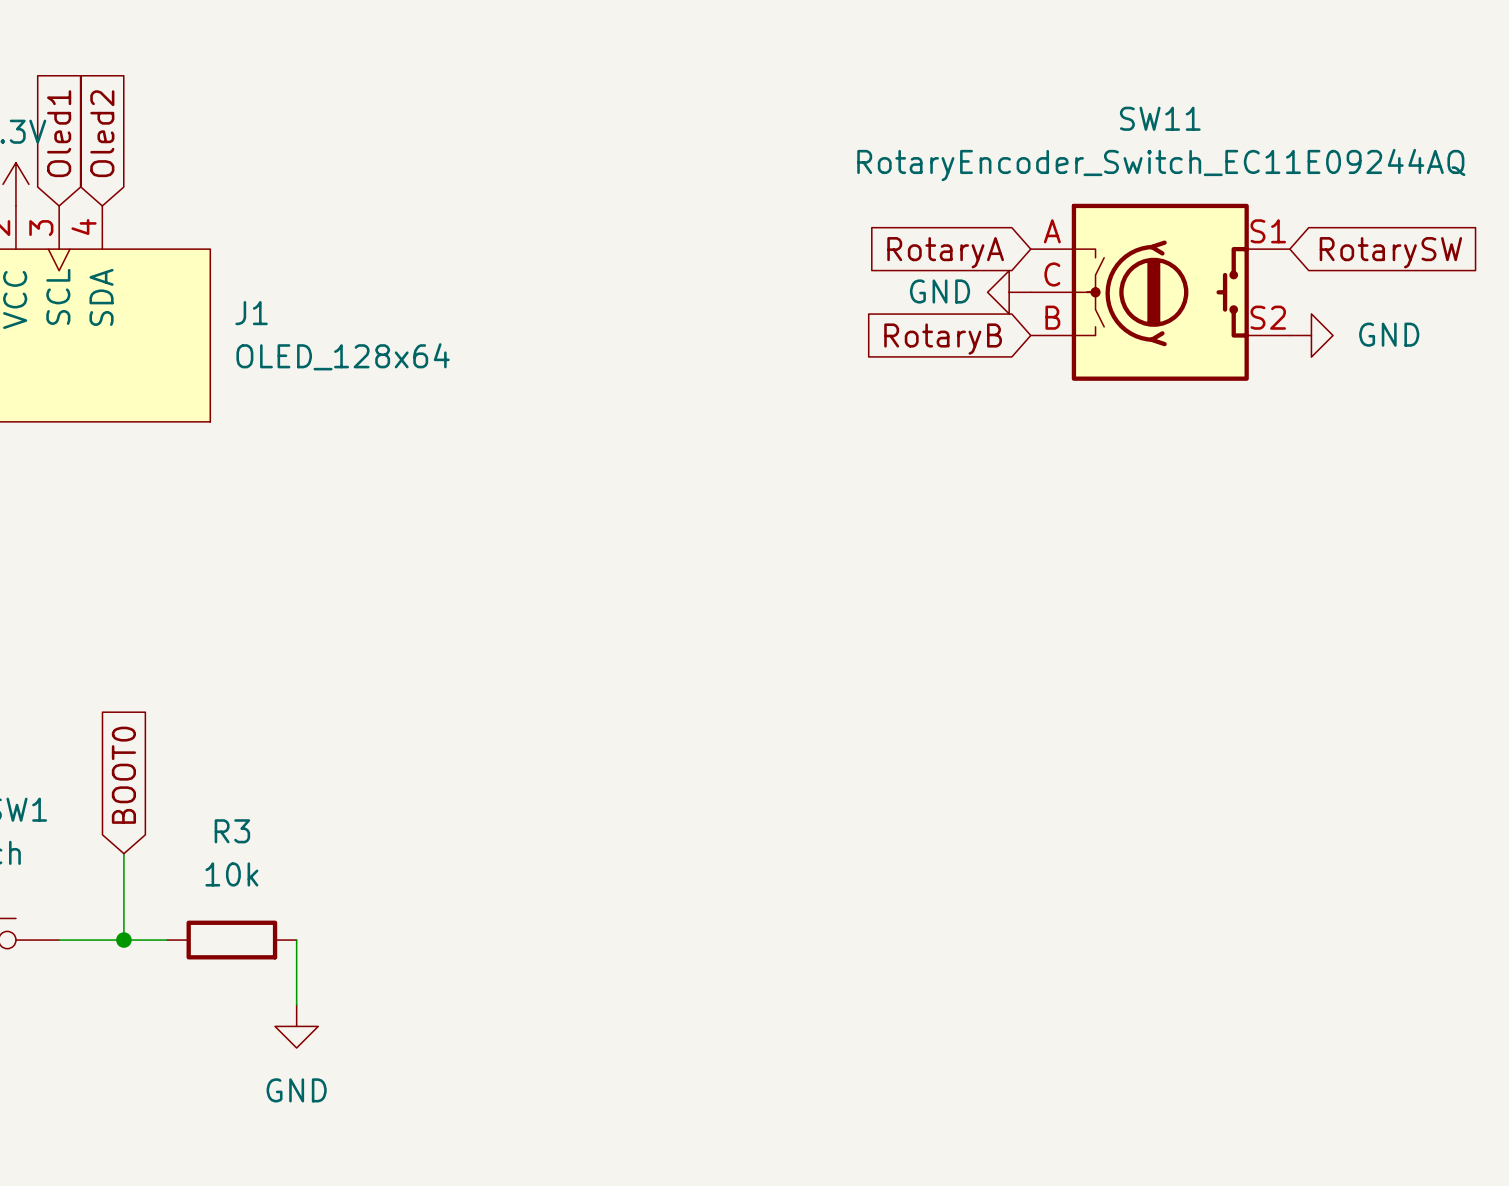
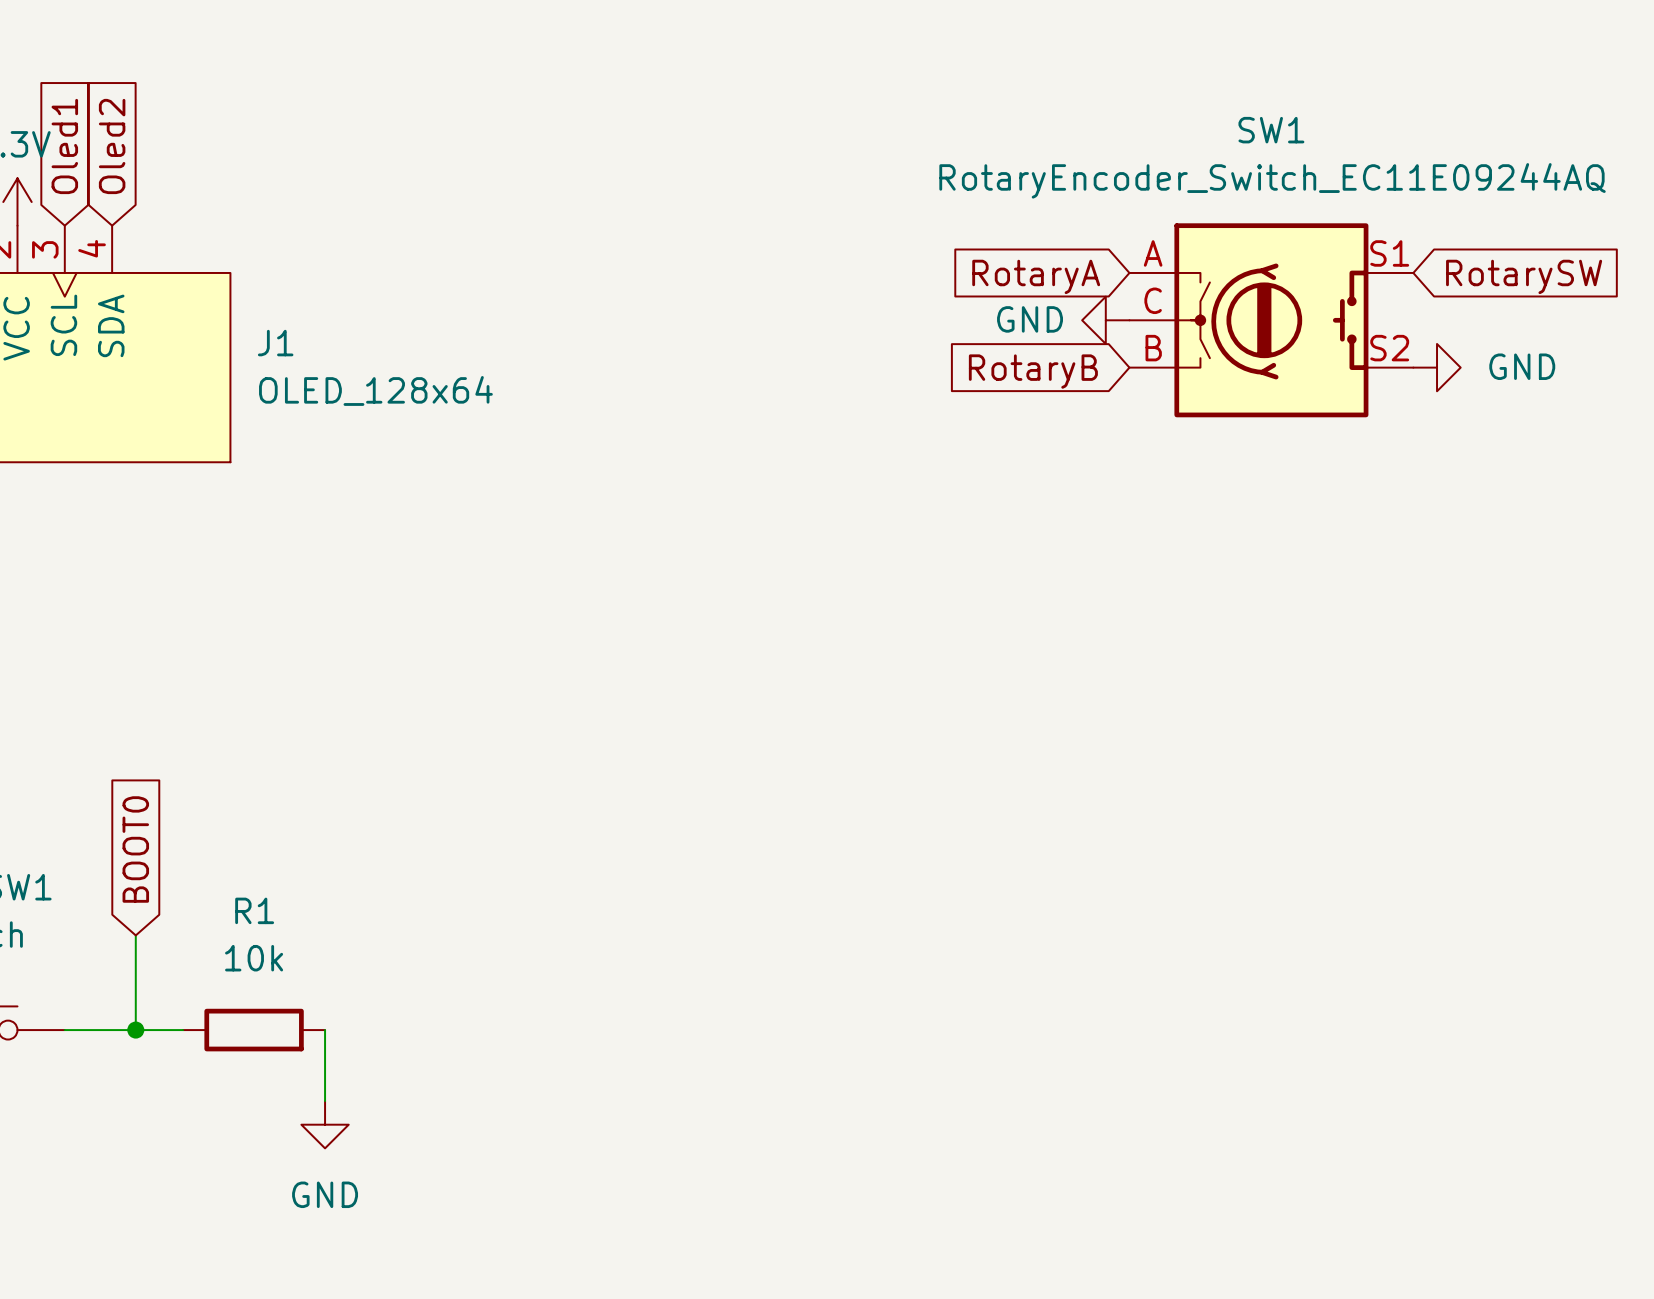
SW11 name: SW11 (1160, 118) -> SW1 (1271, 130)
R3 name: R3 (232, 831) -> R1 (254, 910)

